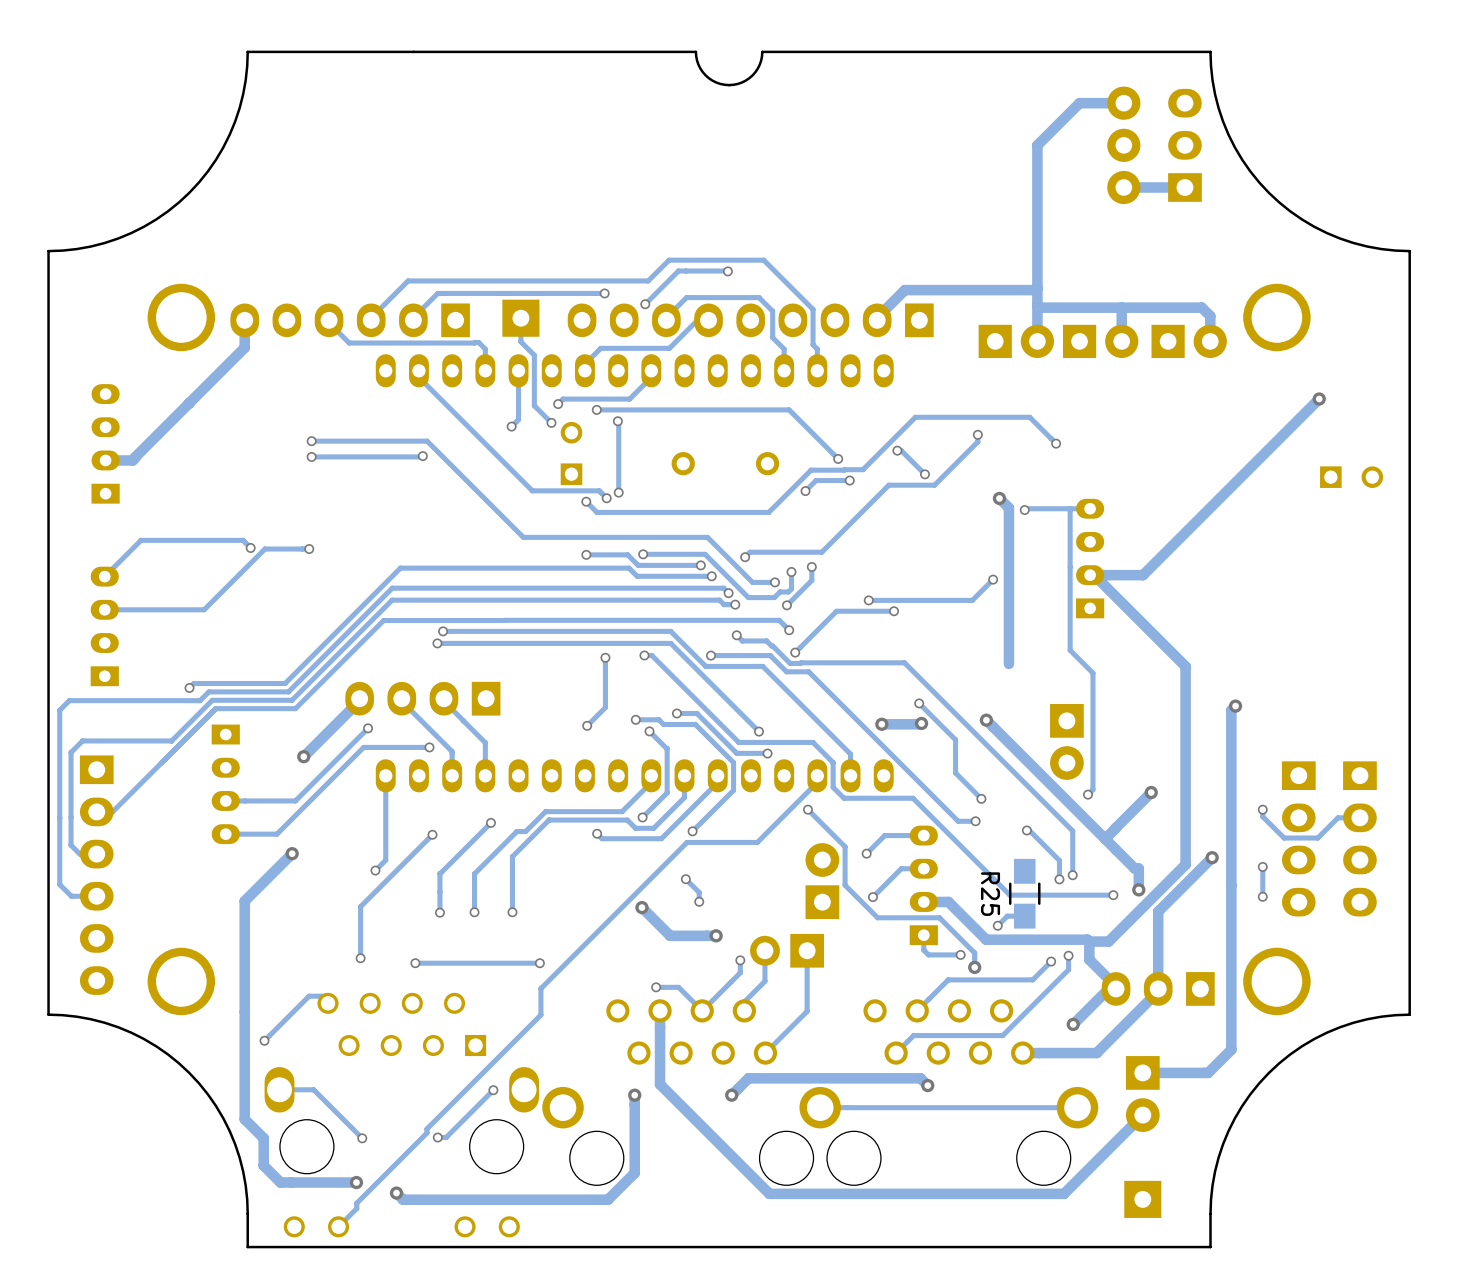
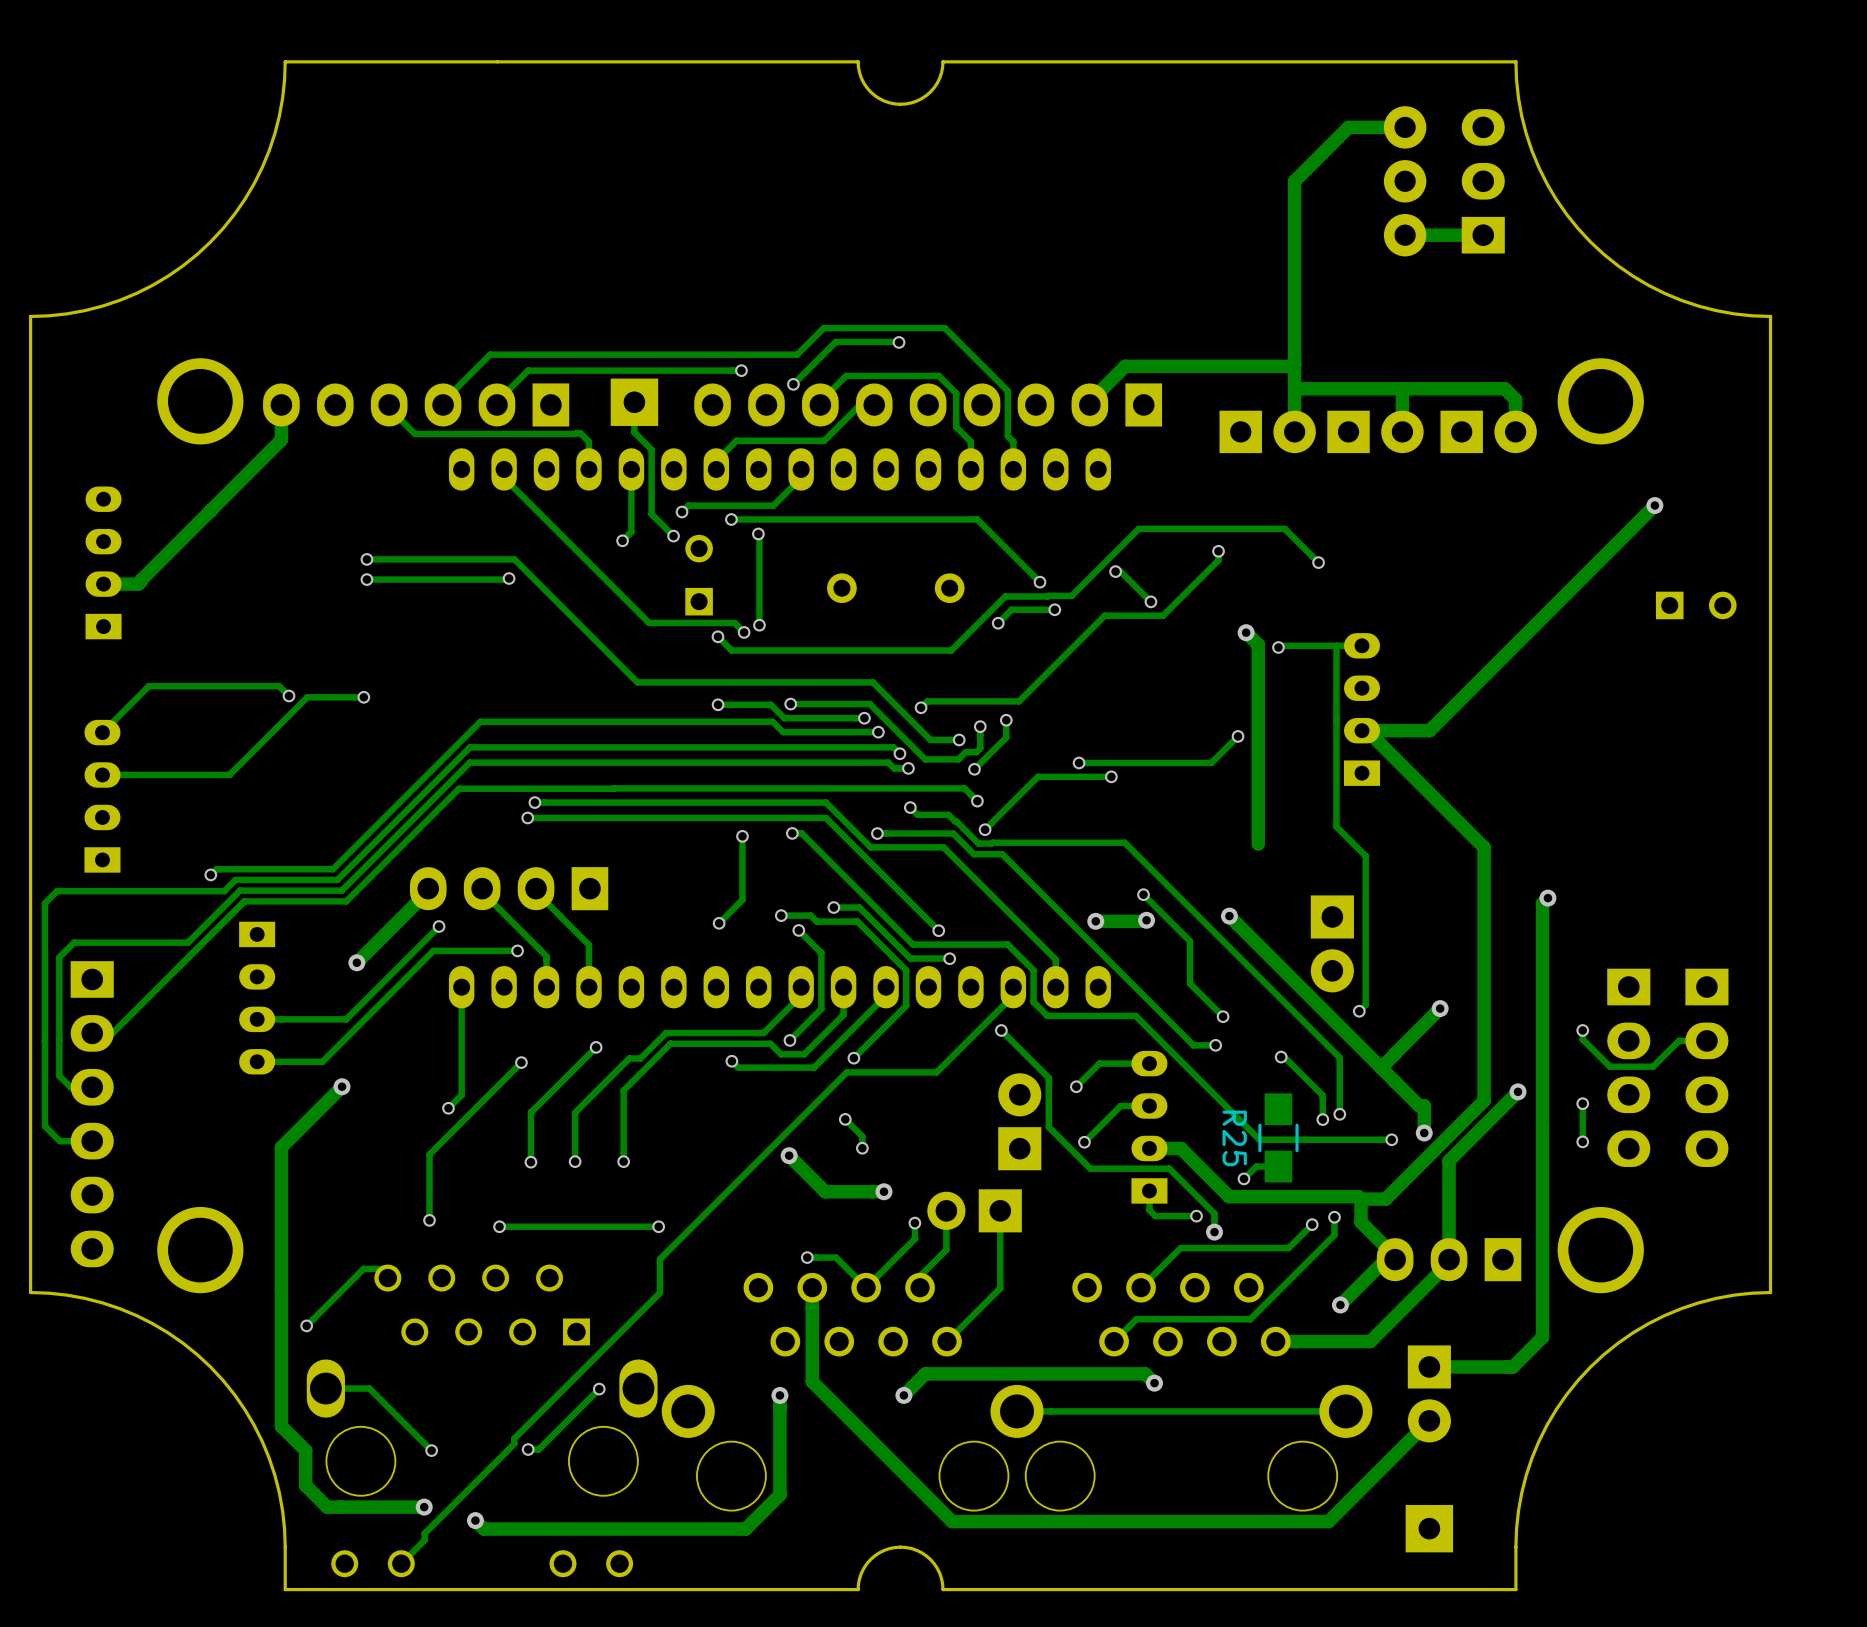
board edge: (762, 1247) (695, 1247) -> (943, 1589) (939, 1573) (930, 1559) (916, 1550) (900, 1547) (884, 1550) (870, 1559) (861, 1573) (858, 1589)

